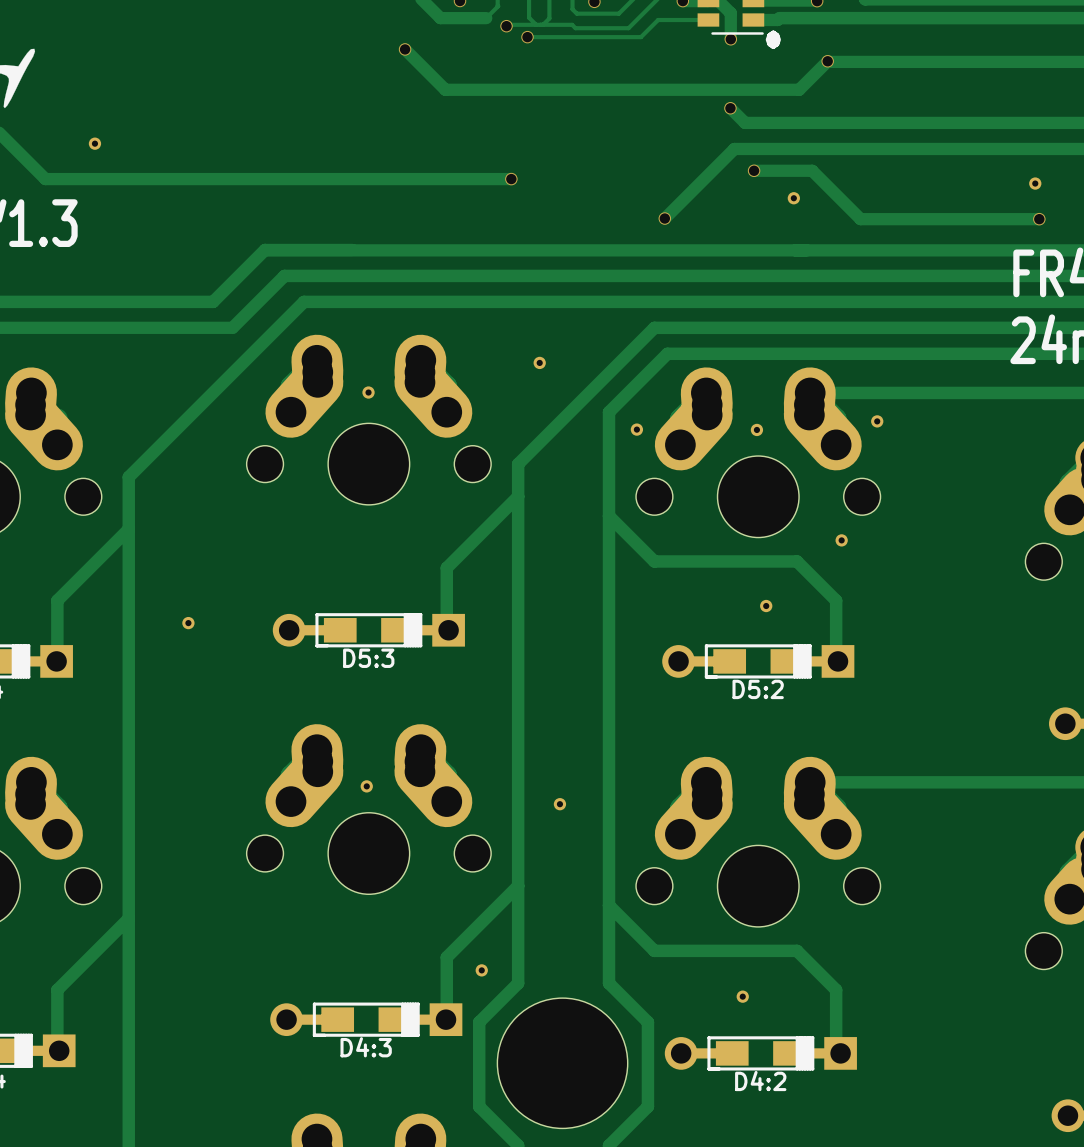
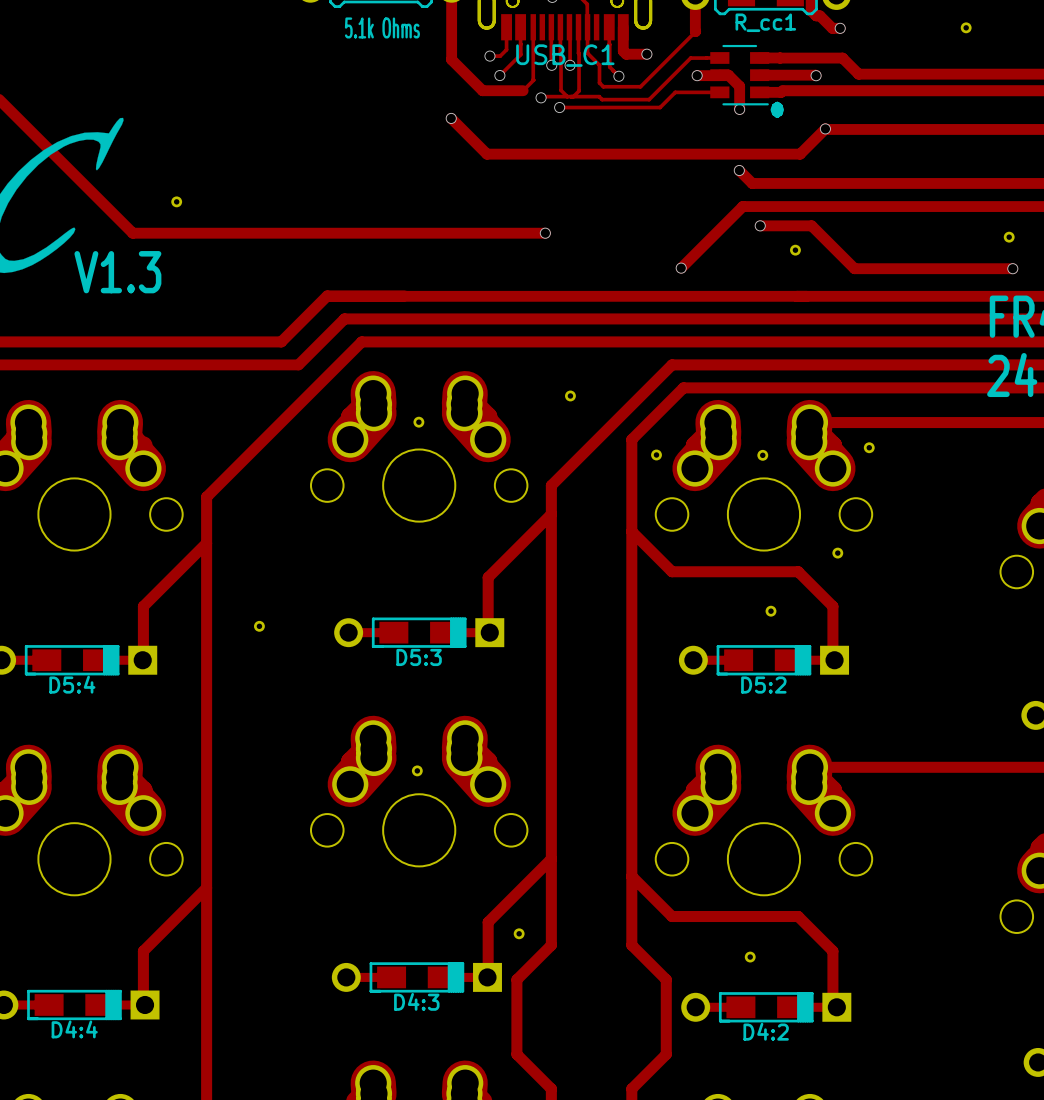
part: (559, 804) -> none
part: (562, 1063) -> none

